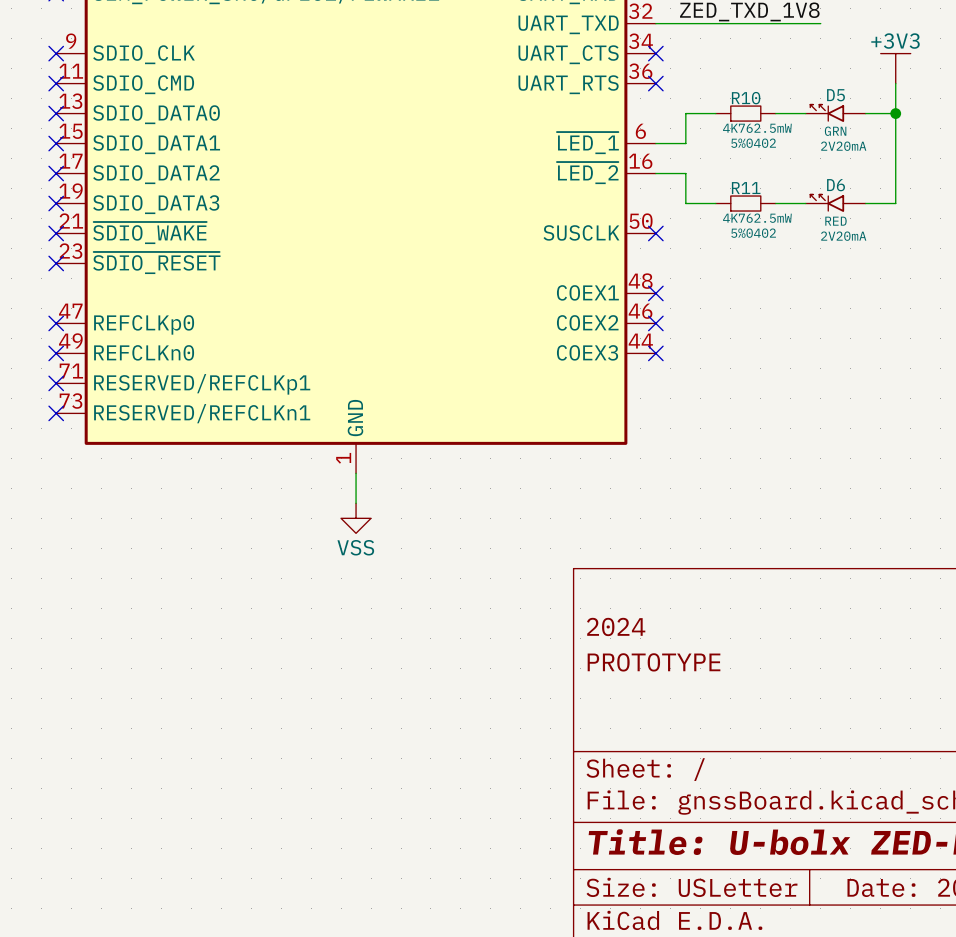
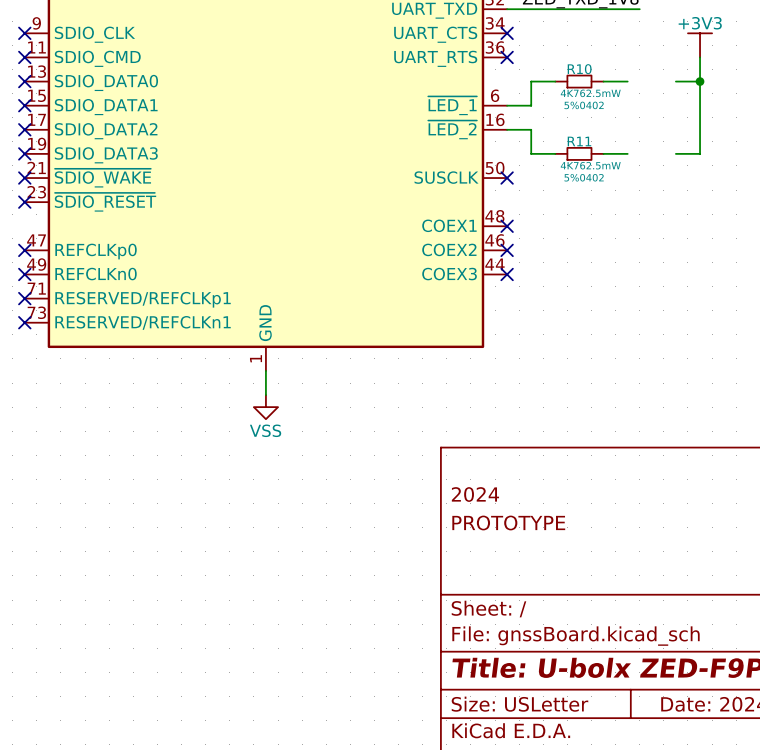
D5: (835, 113) -> none
D6: (835, 203) -> none

